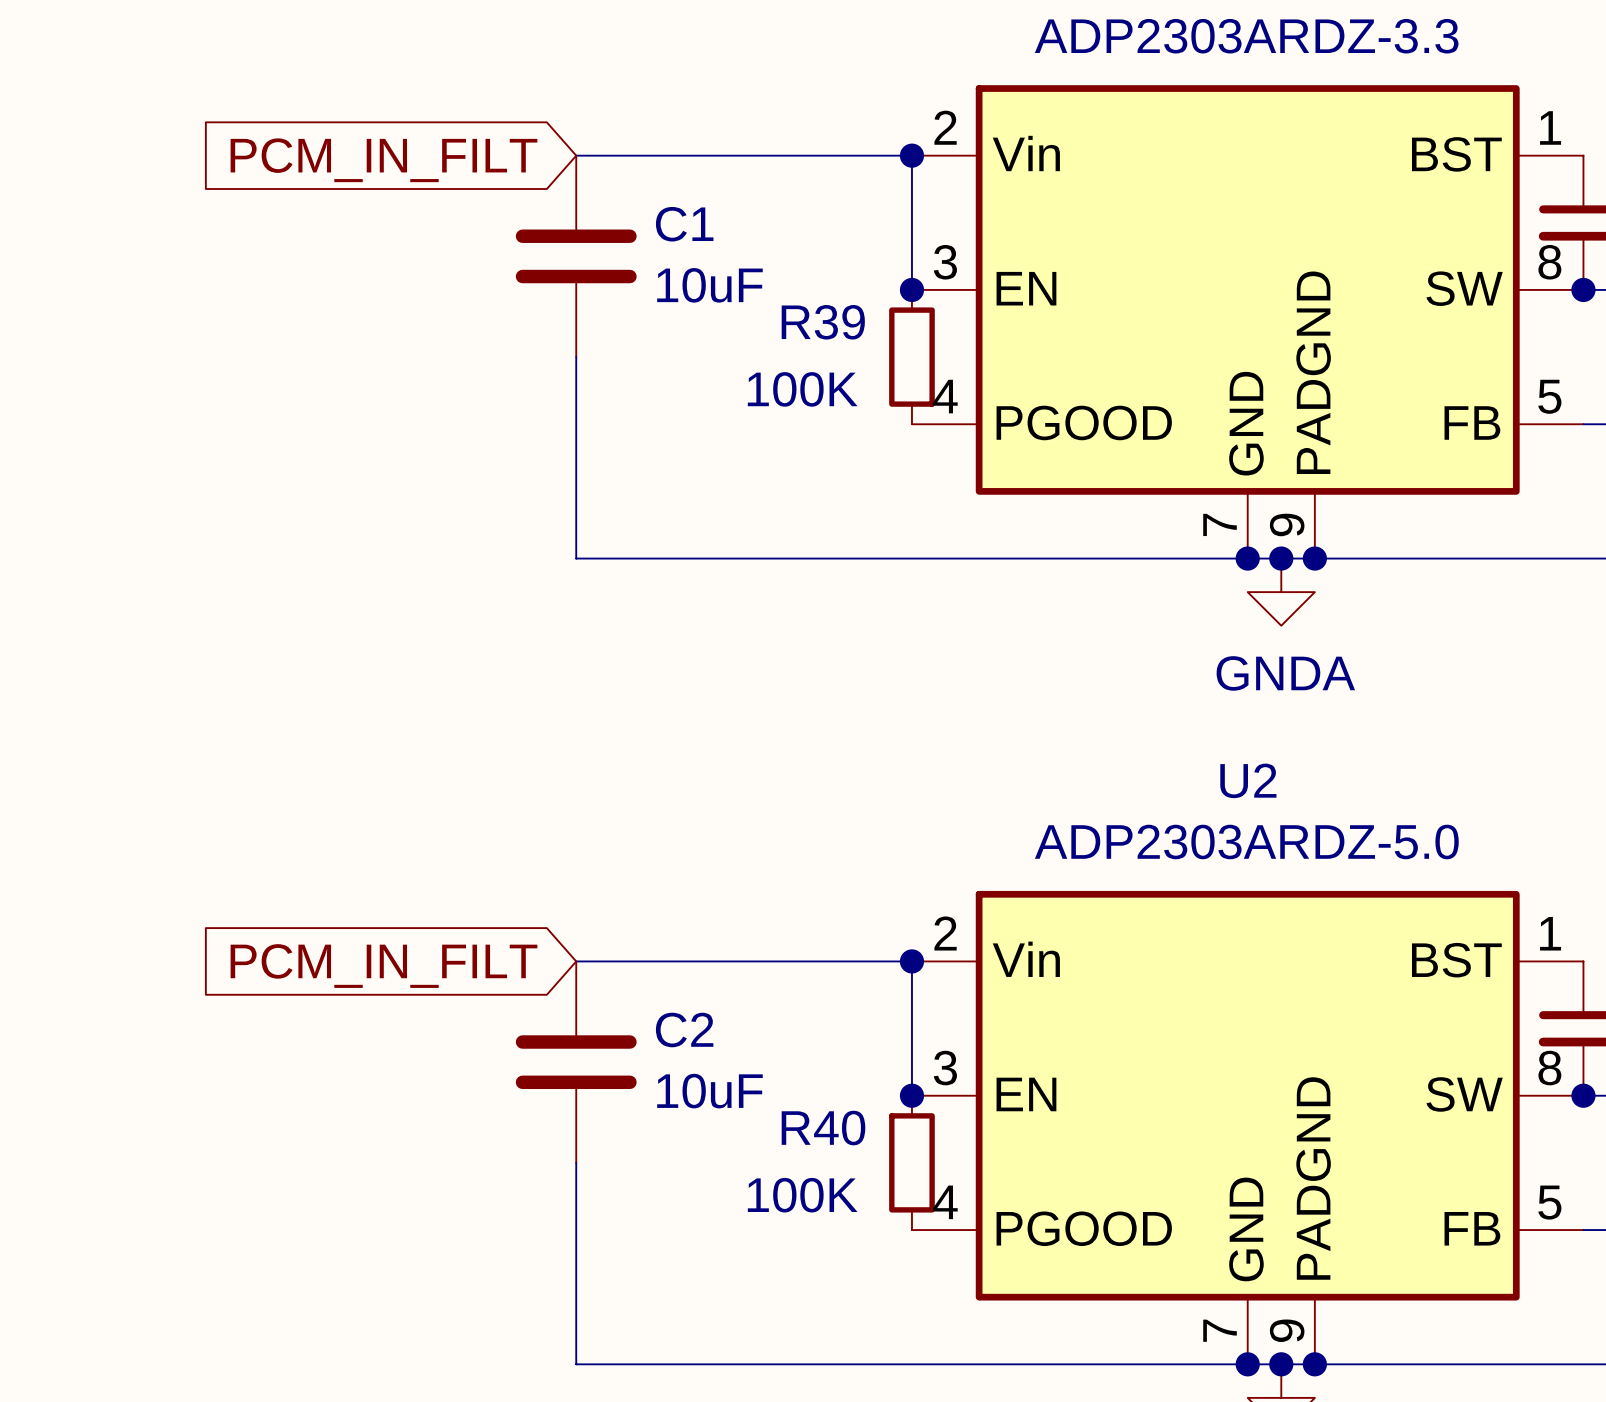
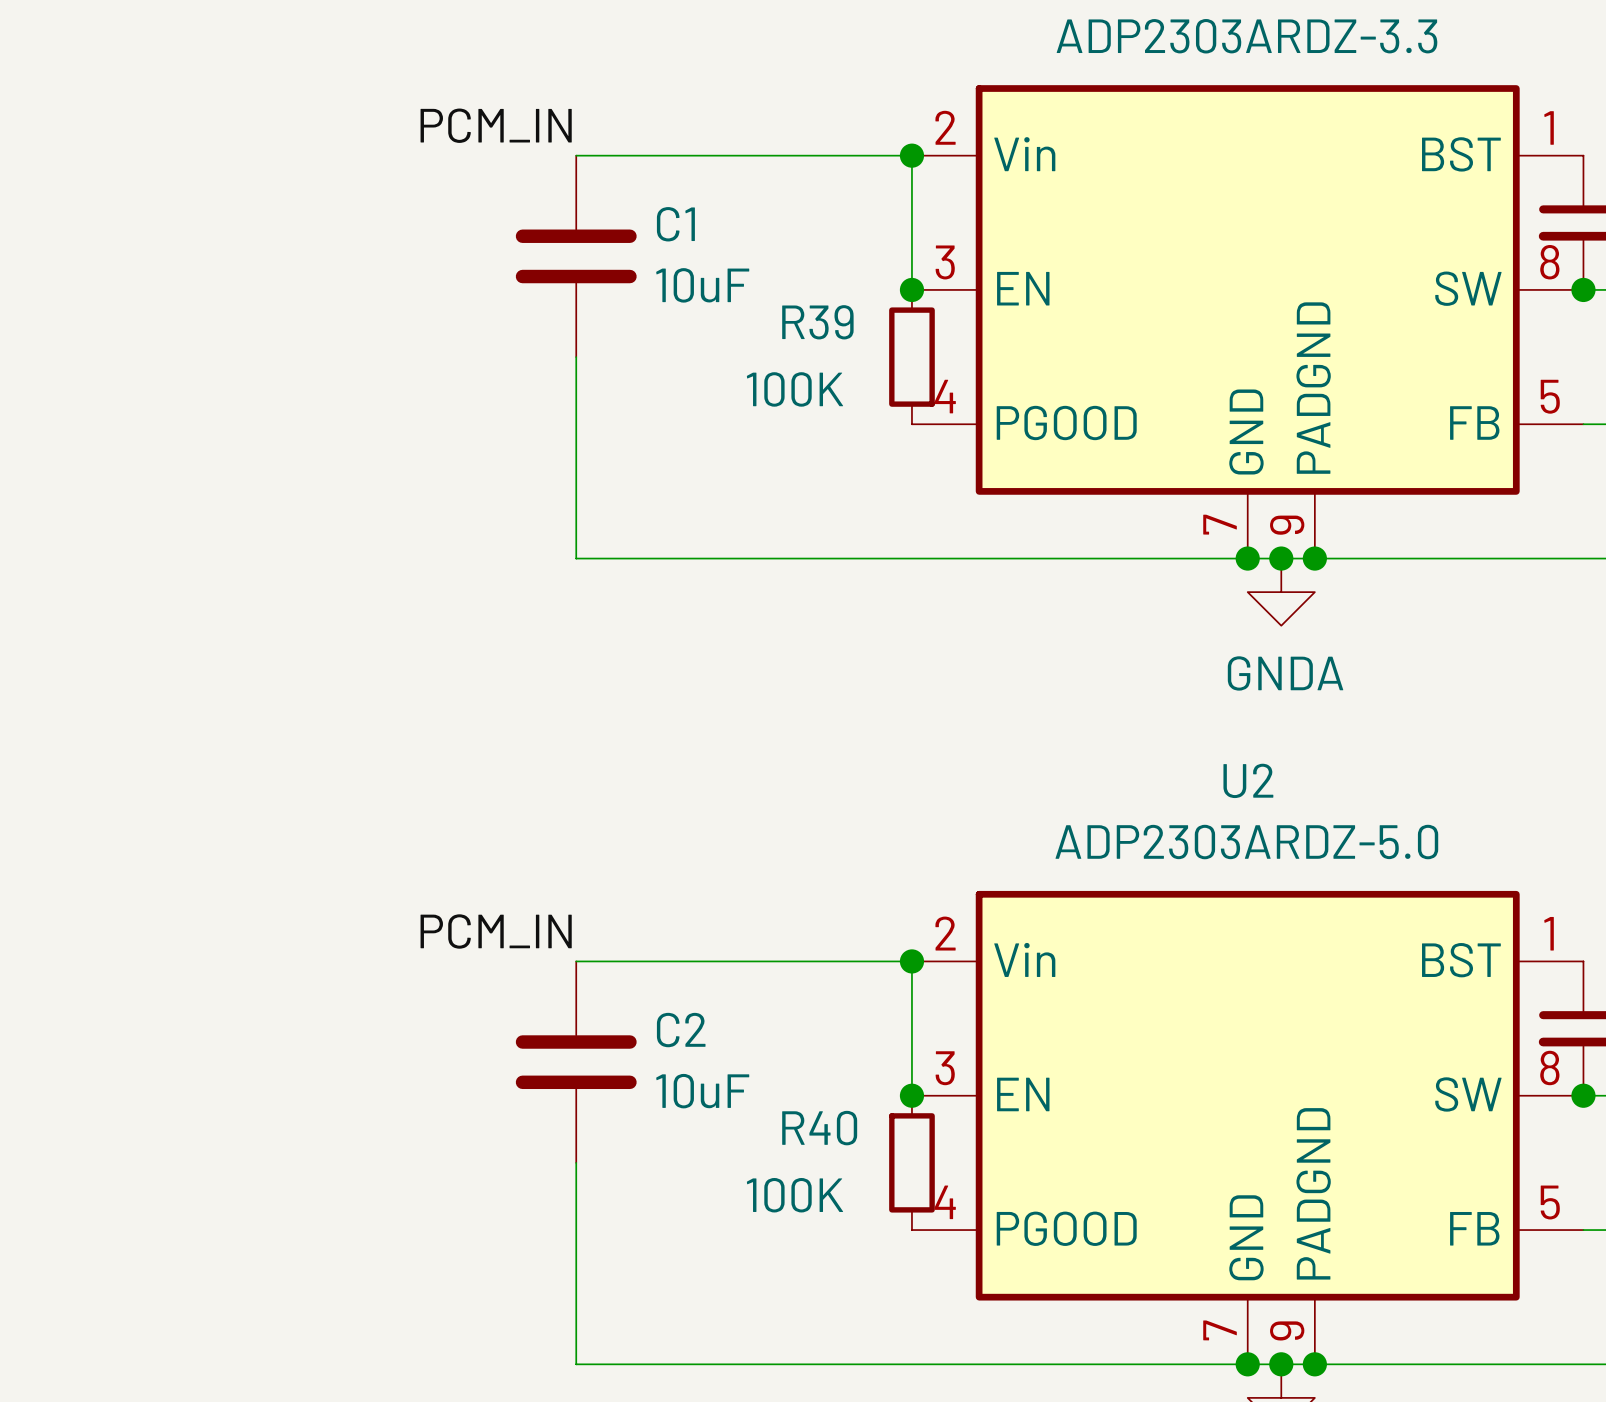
label: none -> PCM_IN (496, 125)
global label: PCM_IN_FILT (383, 160) -> none
label: none -> PCM_IN (496, 931)
global label: PCM_IN_FILT (383, 966) -> none

